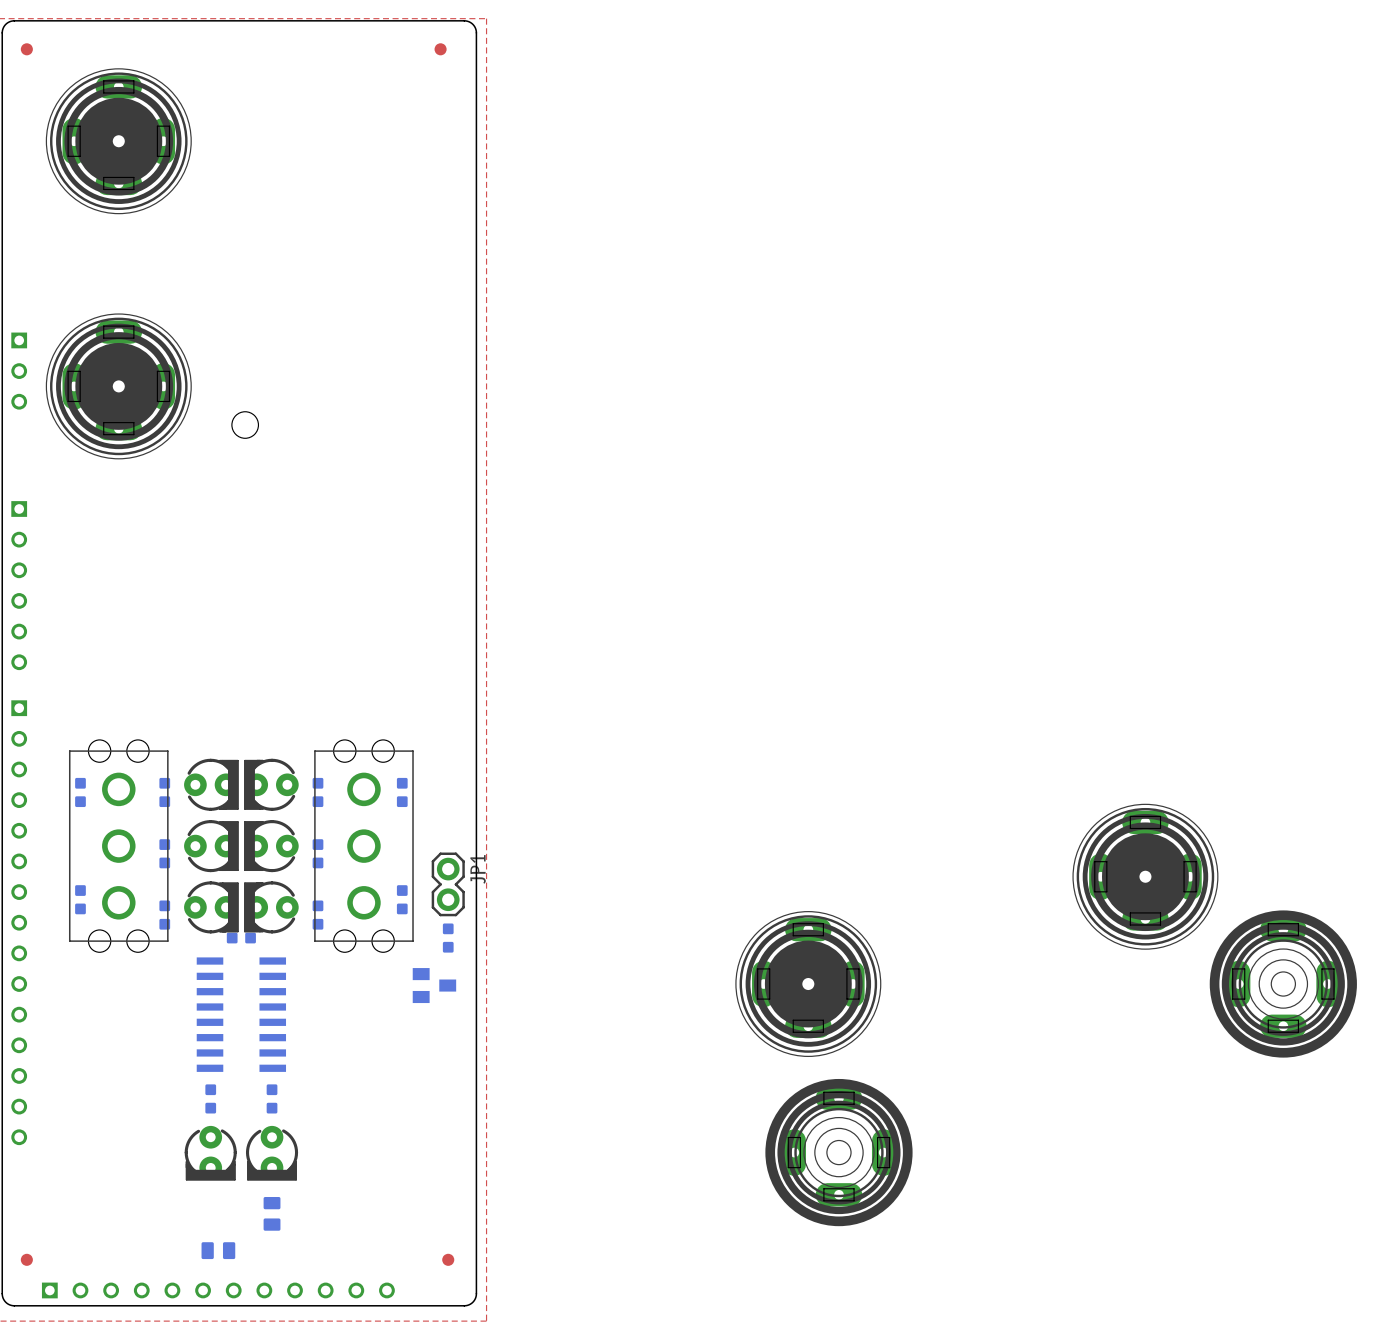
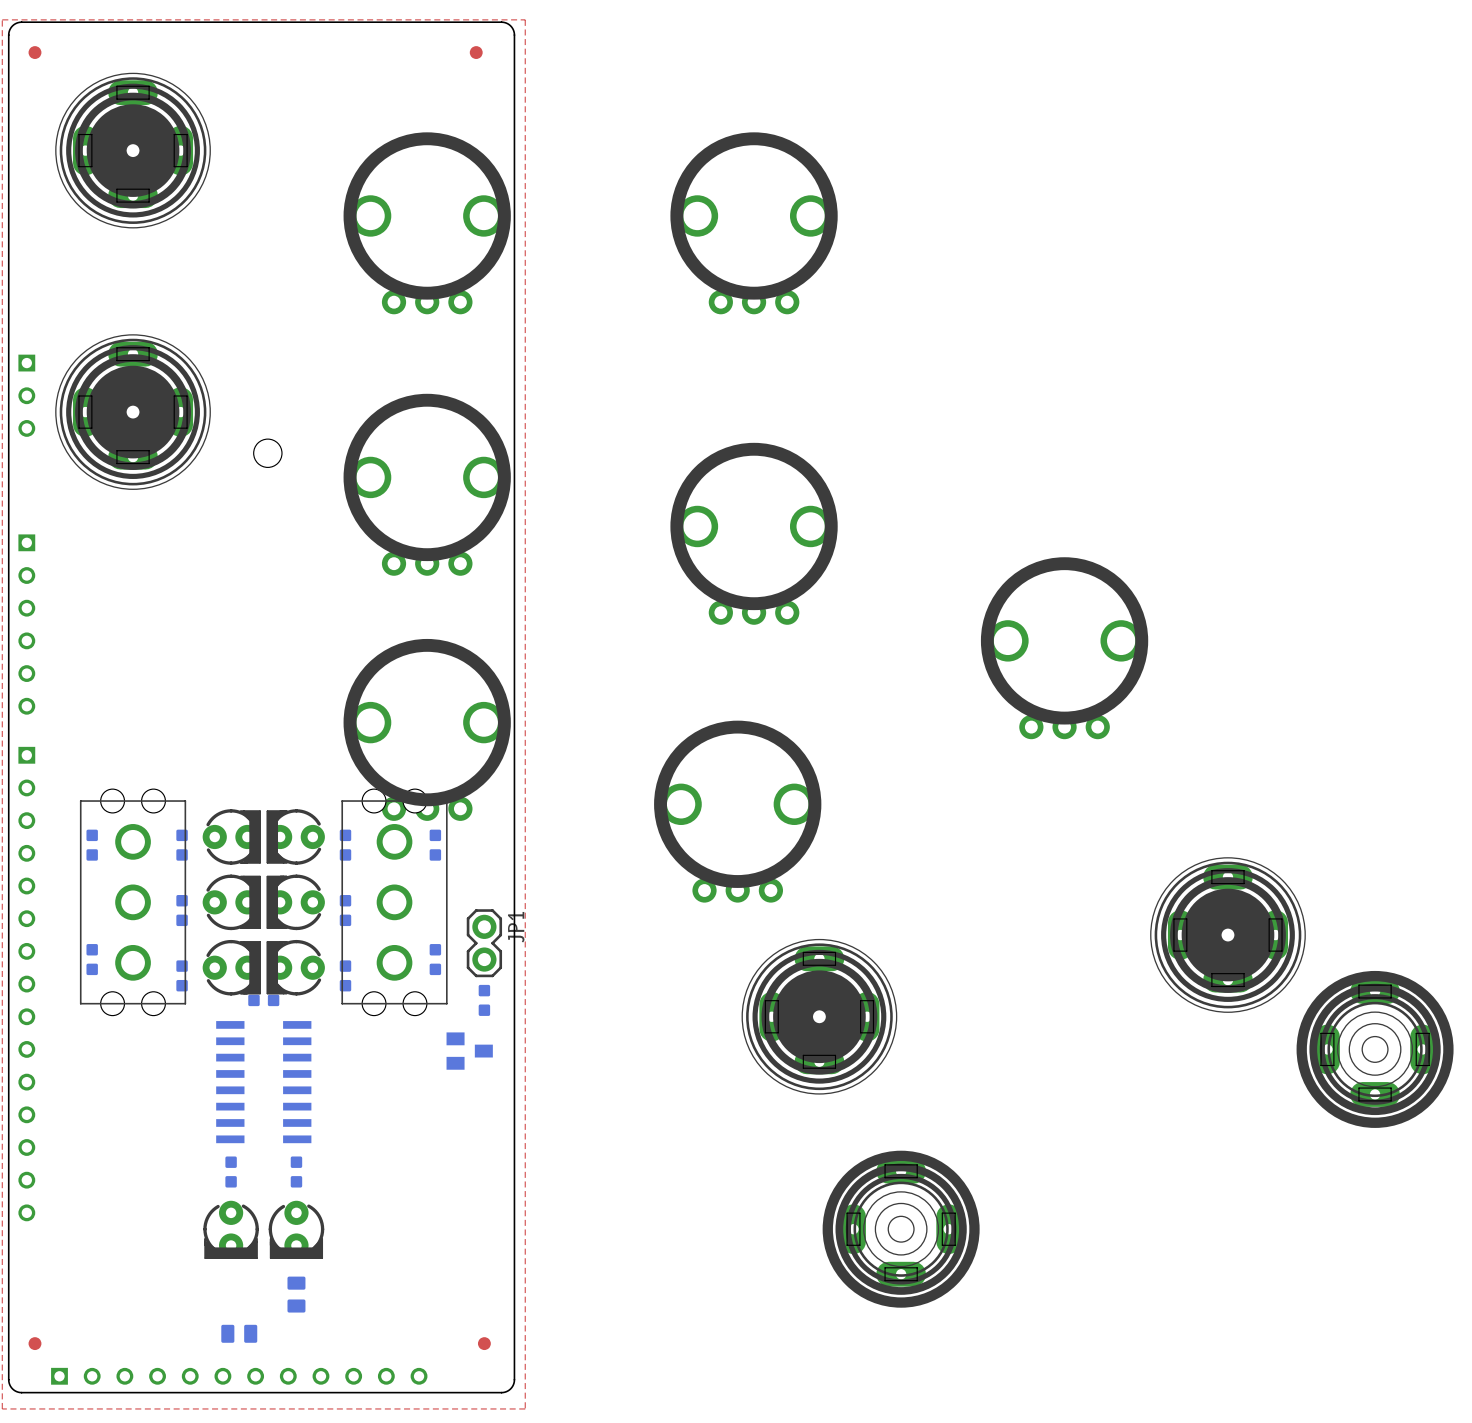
part: none -> (427, 223)
part: none -> (754, 223)
part: none -> (427, 484)
part: none -> (754, 533)
part: none -> (1064, 648)
part: none -> (427, 729)
part: none -> (737, 811)
part position: (808, 984) -> (819, 1016)

